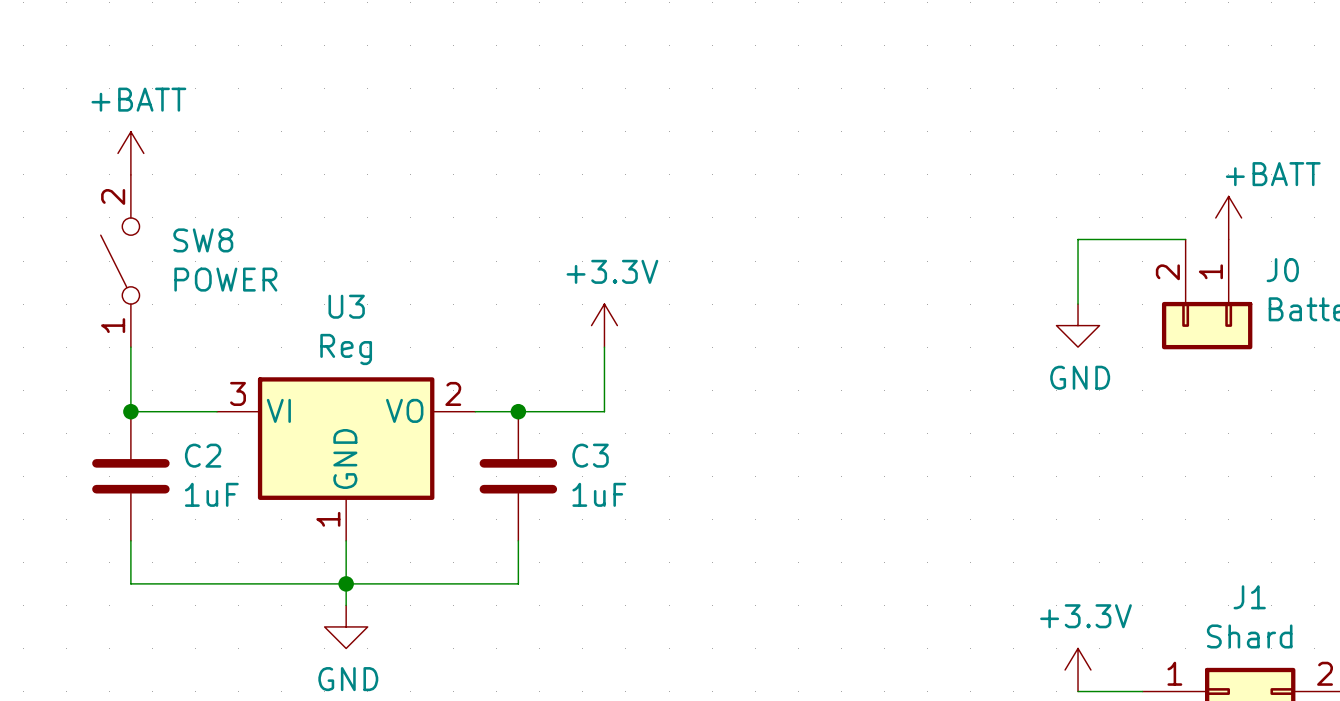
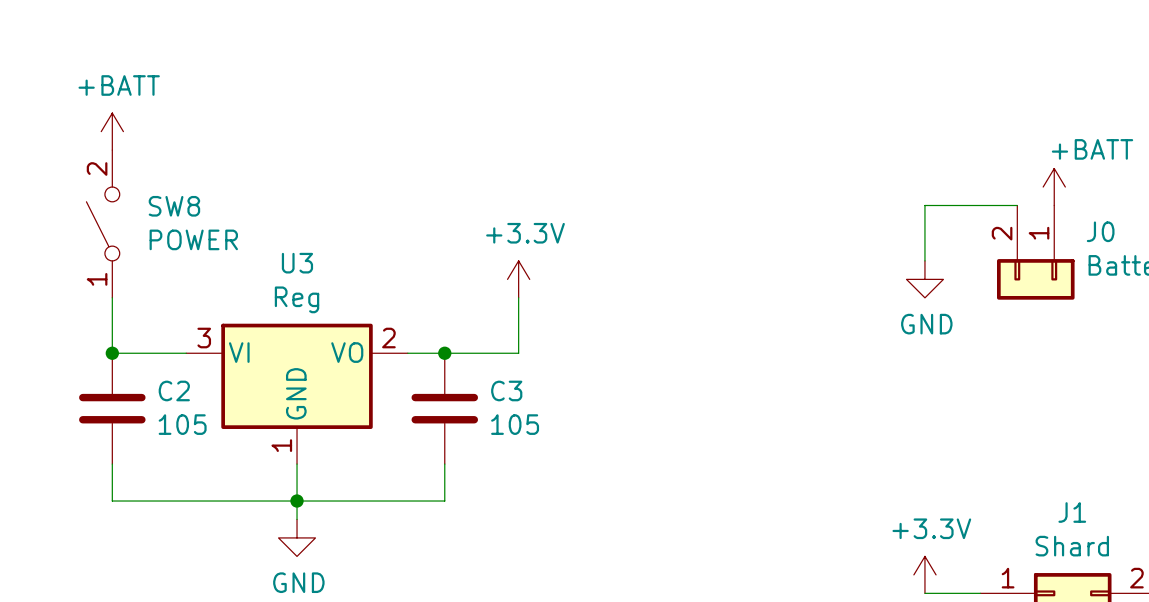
C2 value: 1uF (211, 494) -> 105 (182, 424)
C3 value: 1uF (599, 494) -> 105 (515, 424)

